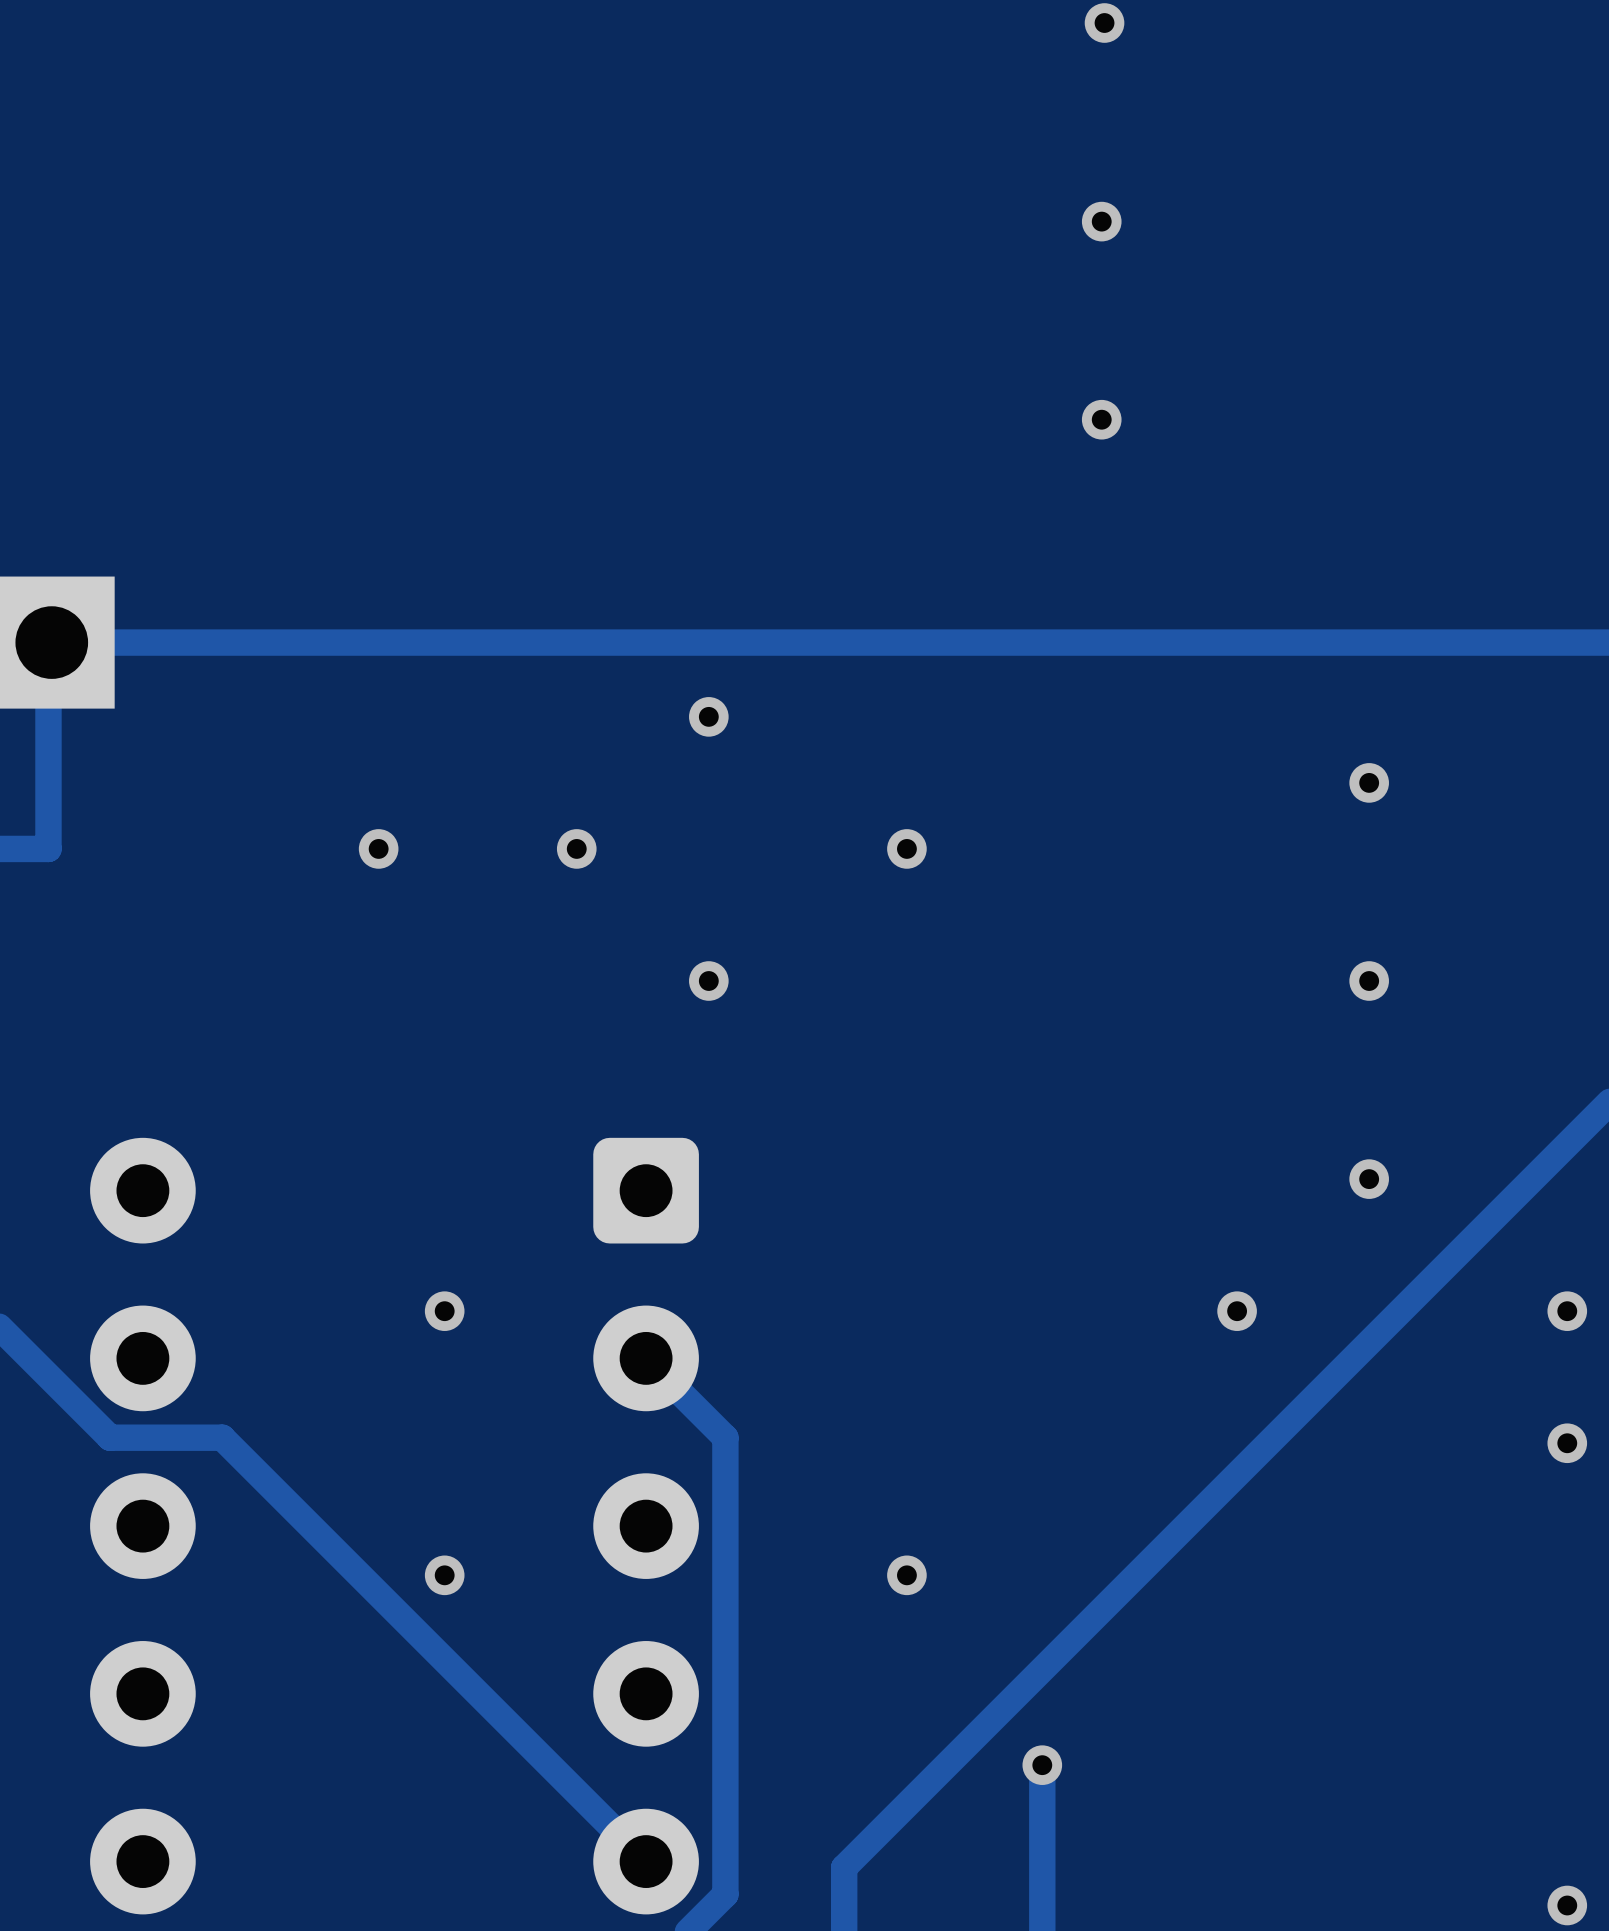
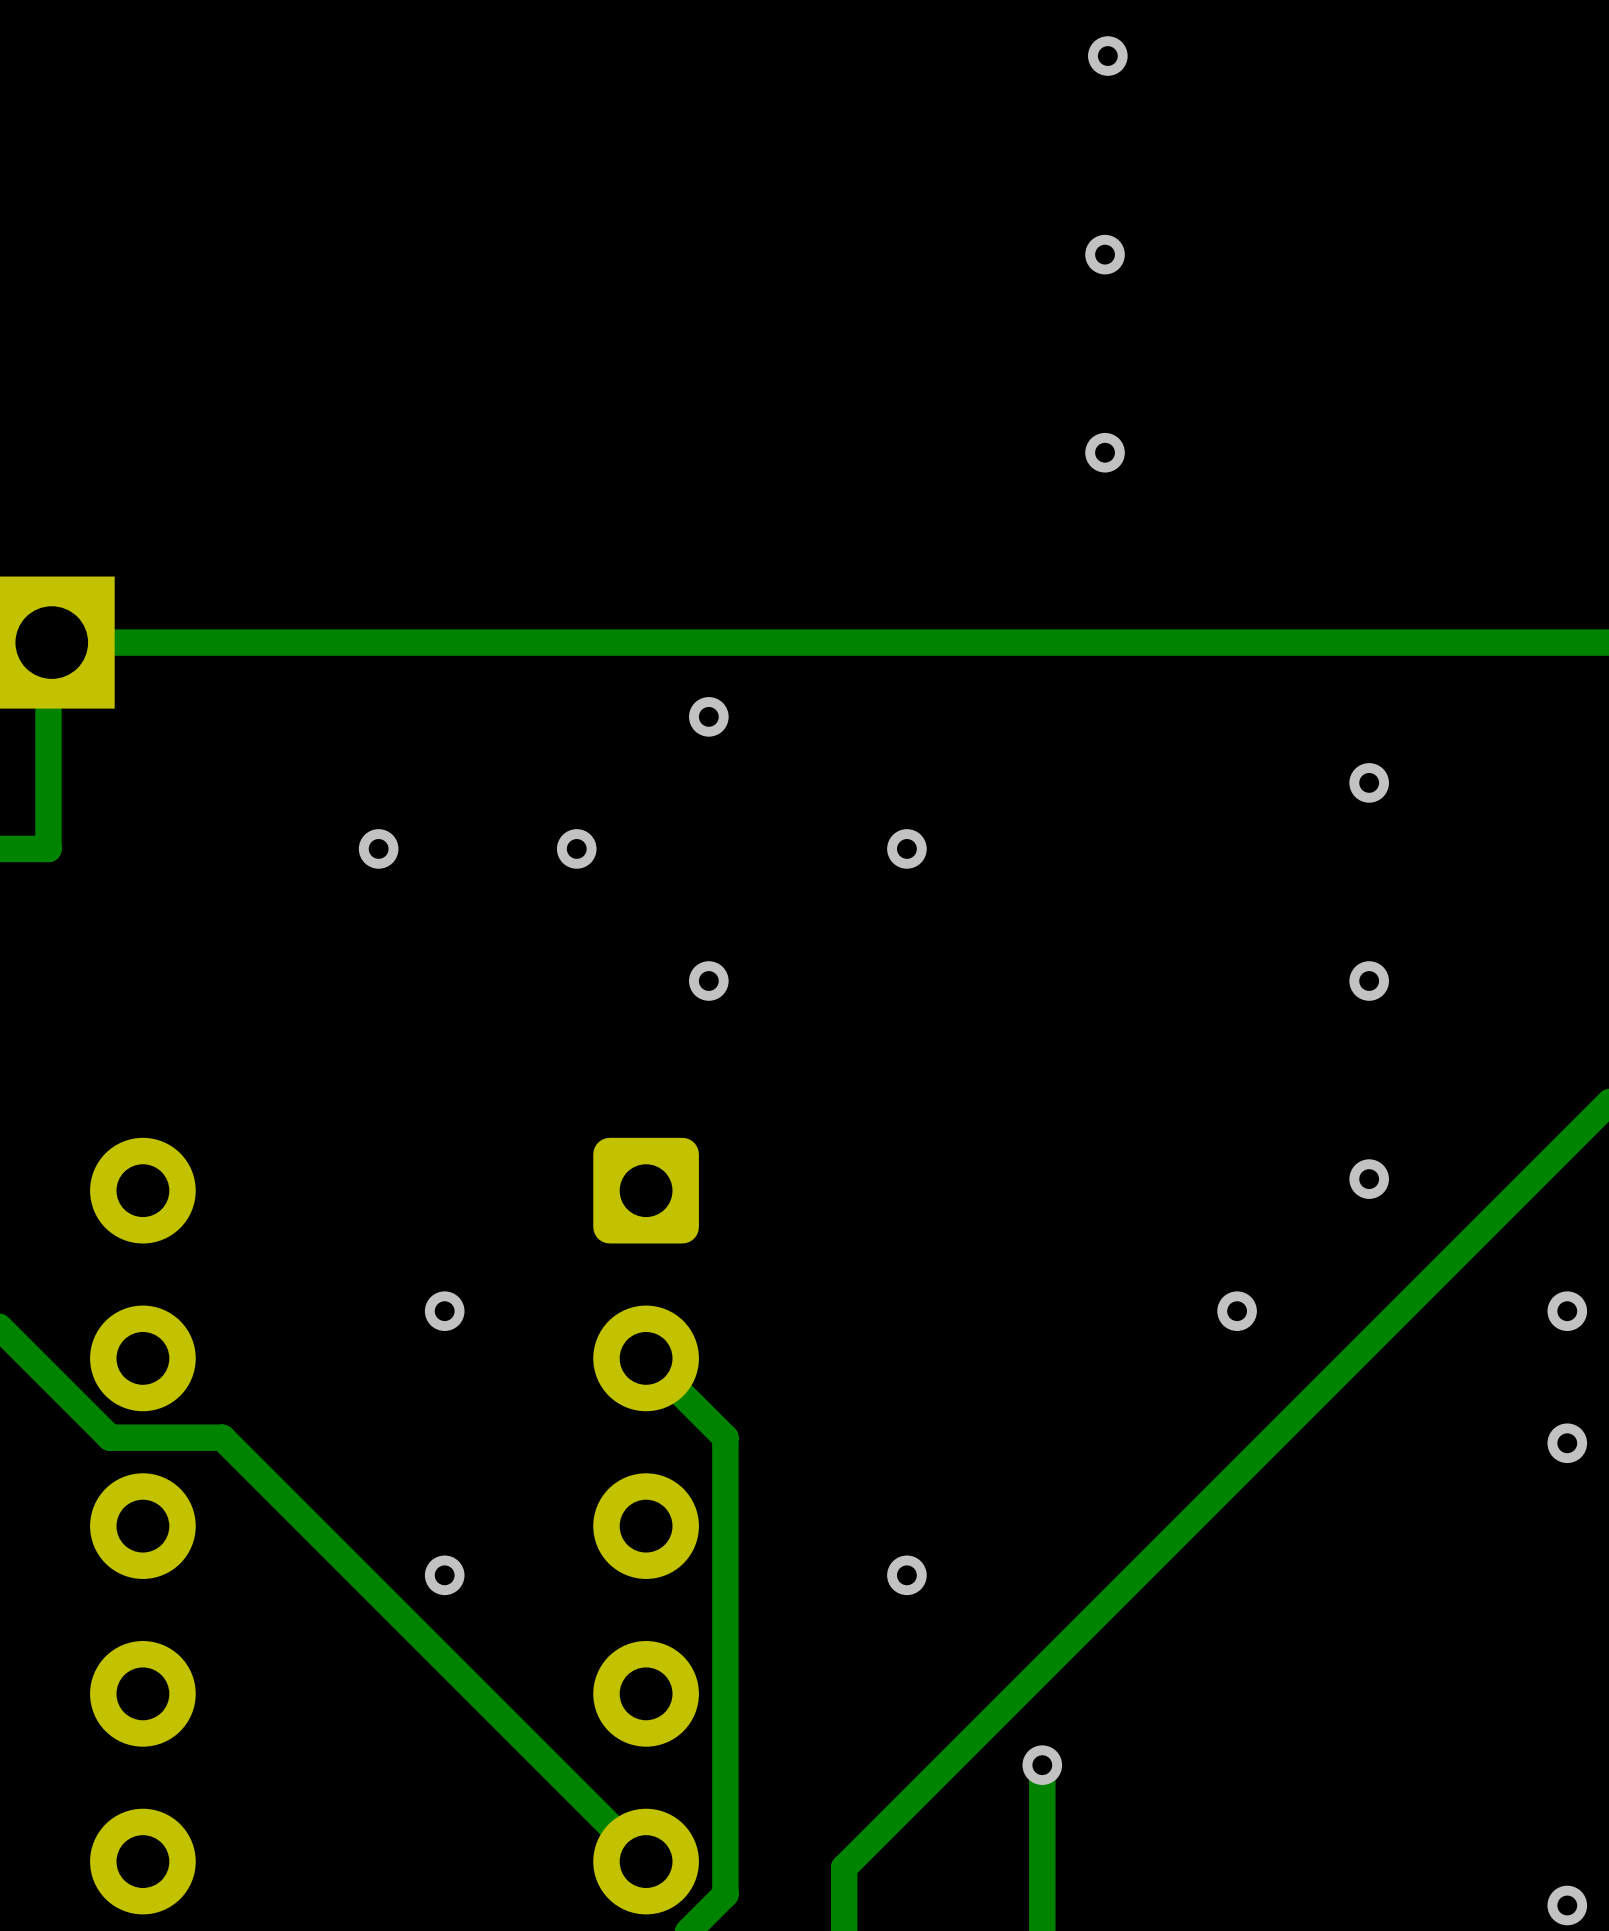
via position: (1104, 23) -> (1107, 56)
via position: (1101, 221) -> (1105, 254)
via position: (1101, 419) -> (1105, 452)

